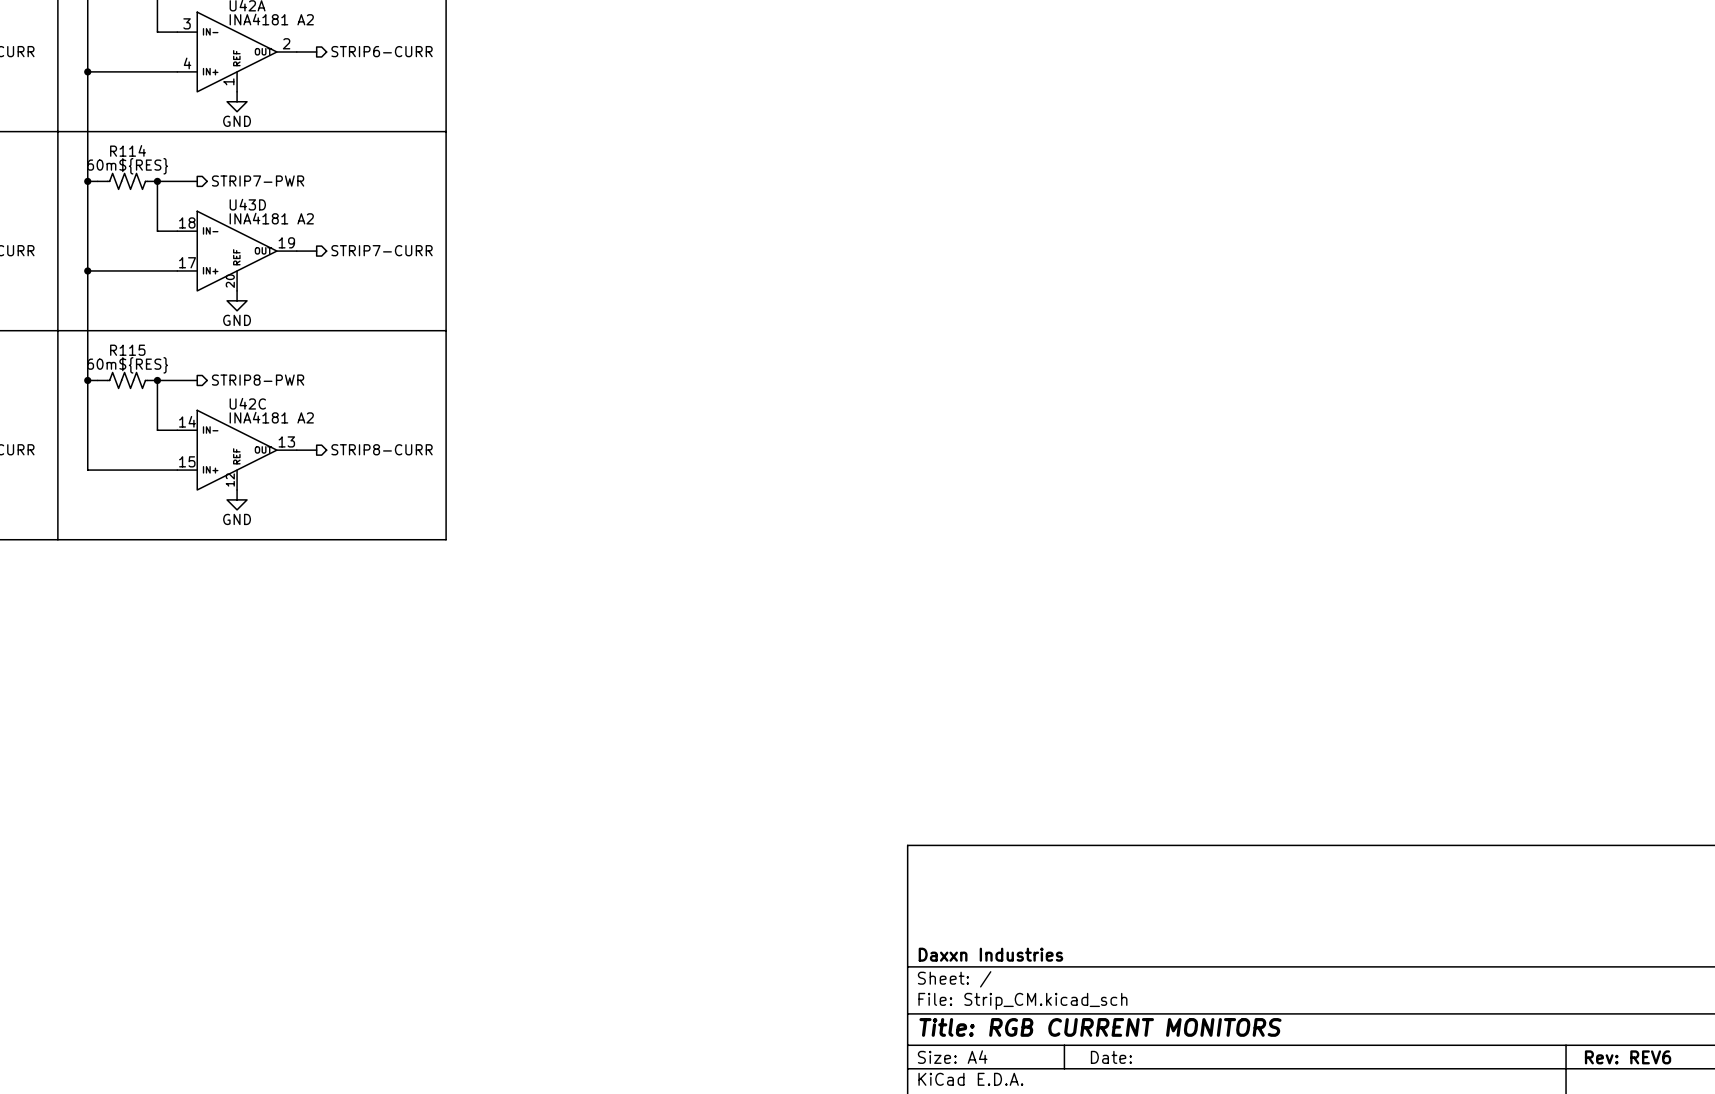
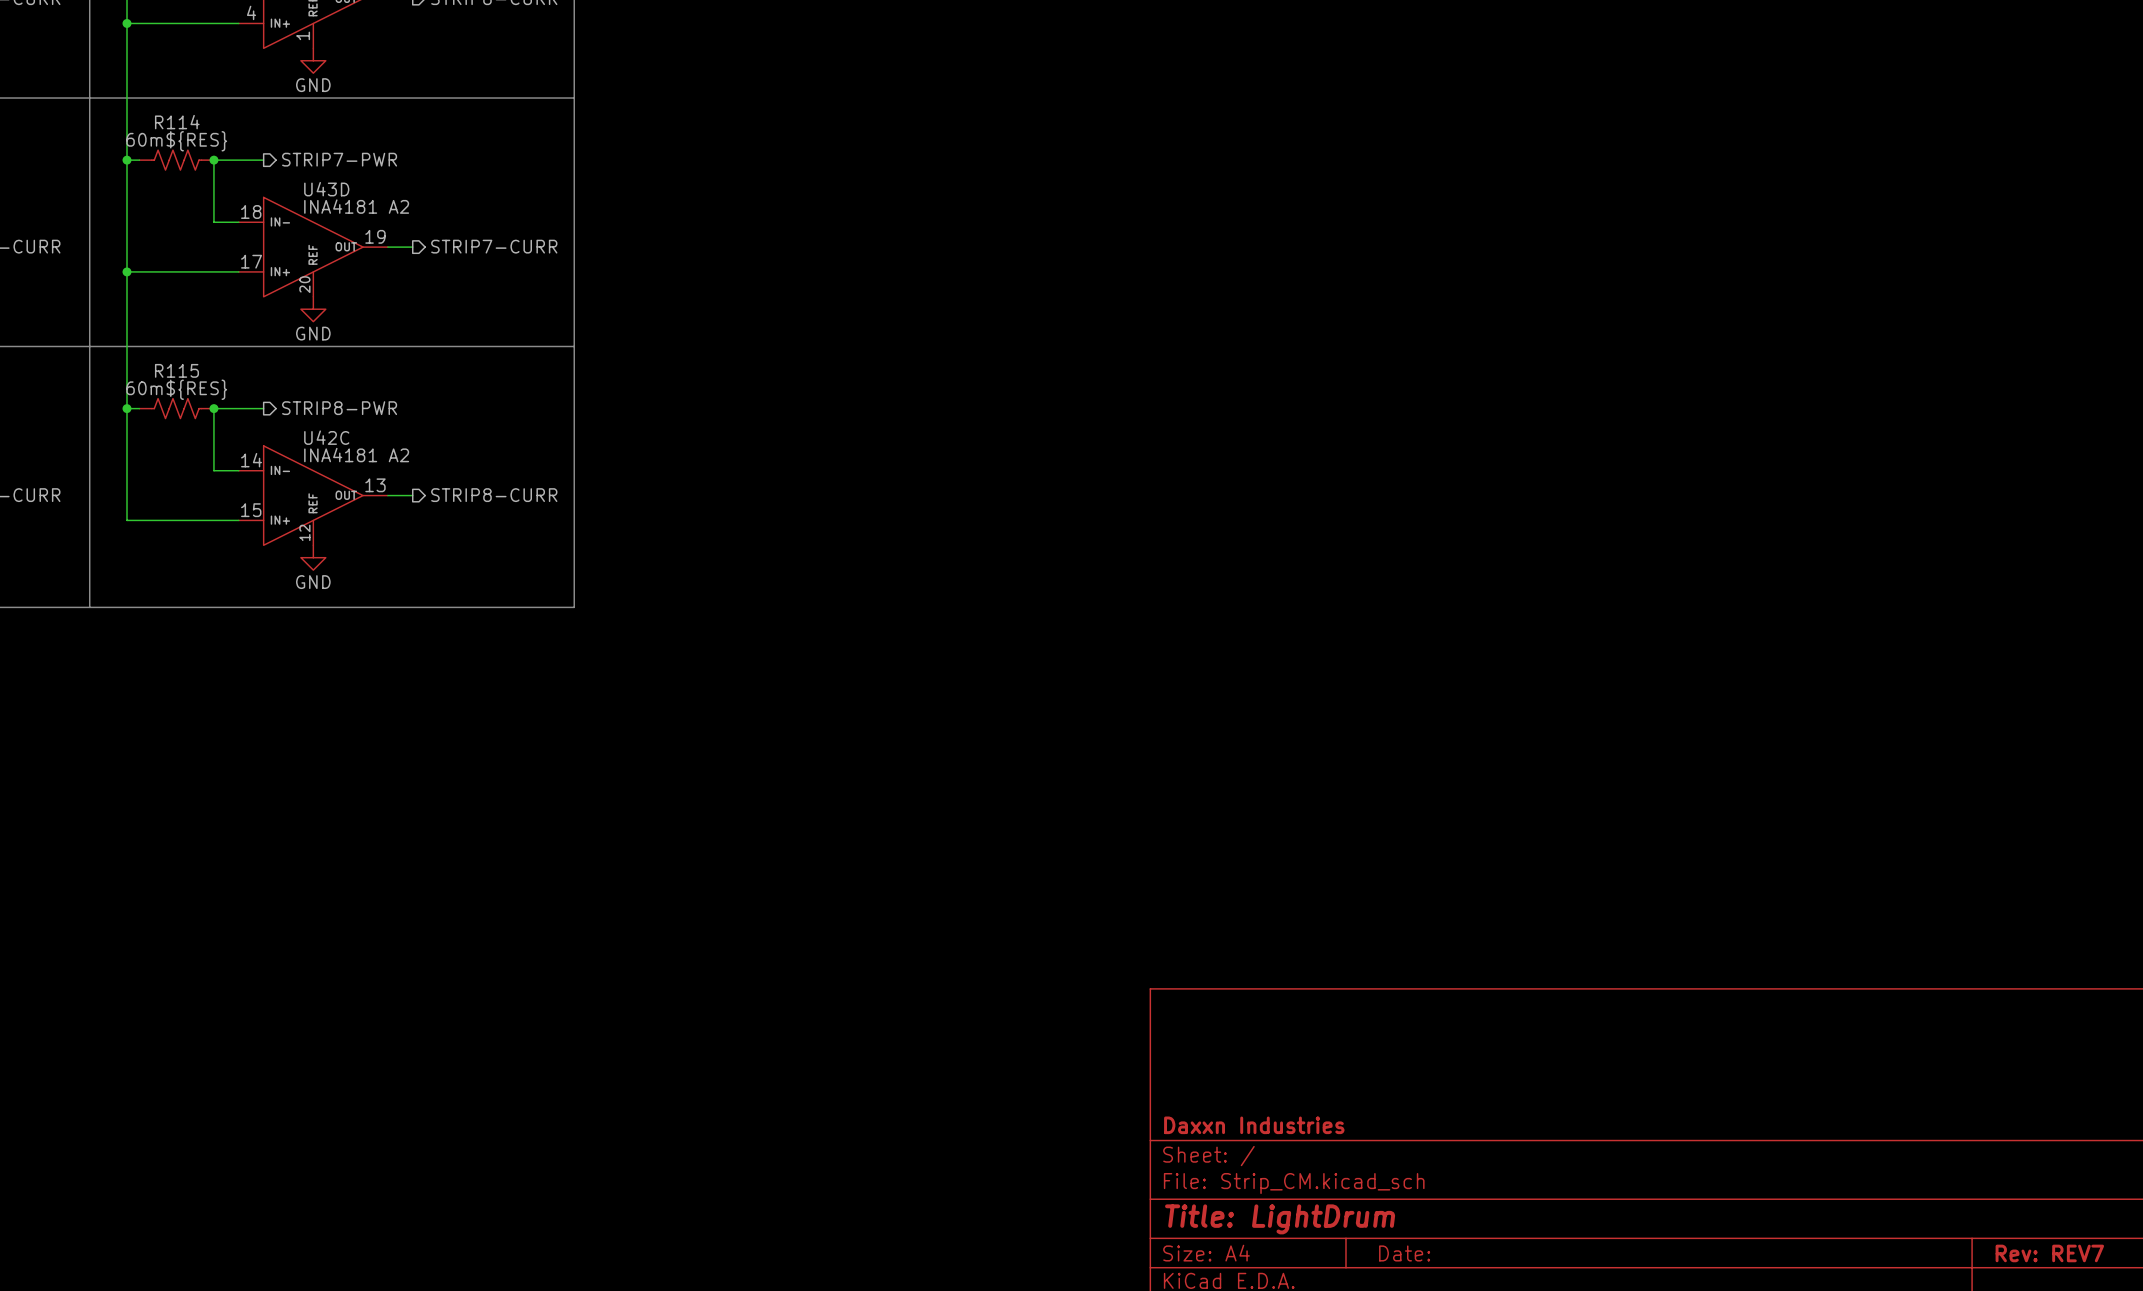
title block: Title: RGB CURRENT MONITORS (1100, 1027) -> Title: LightDrum (1280, 1219)
title block: Rev: REV6 (1628, 1057) -> Rev: REV7 (2049, 1253)

